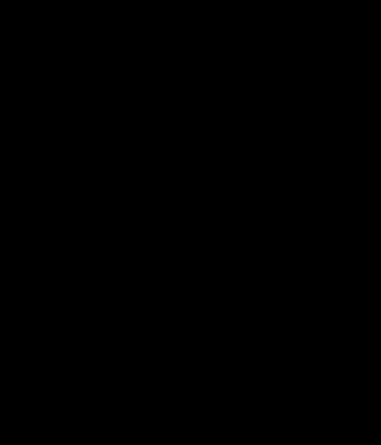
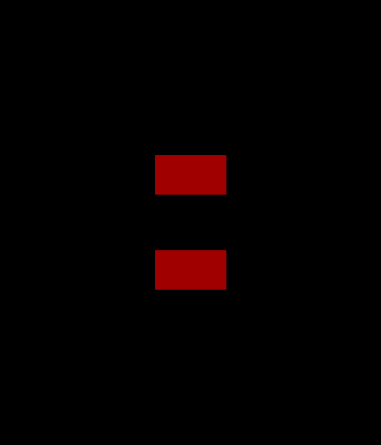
part: none -> (190, 222)

